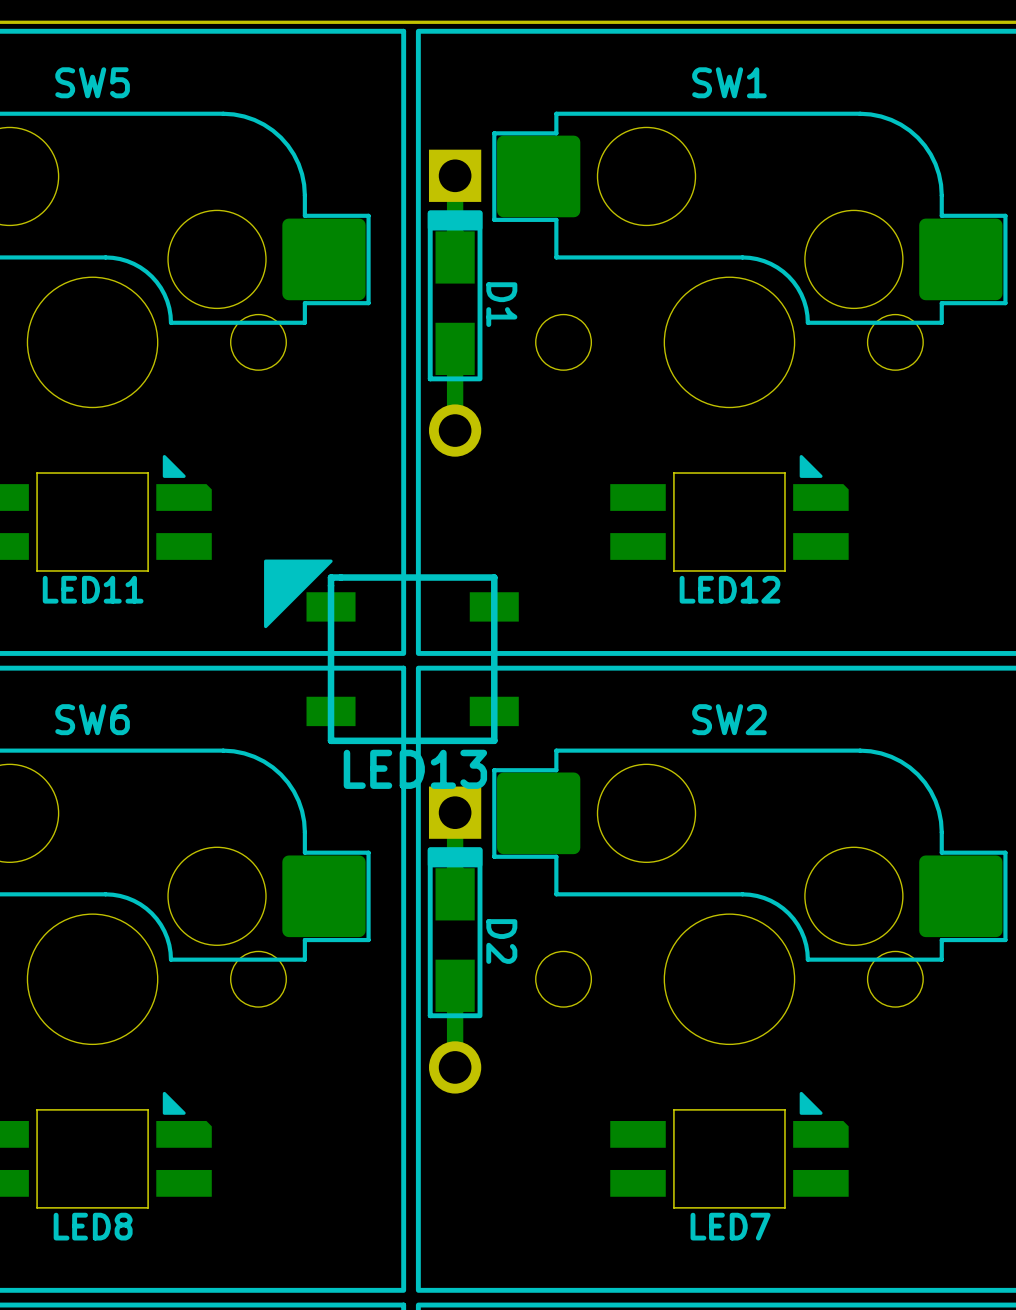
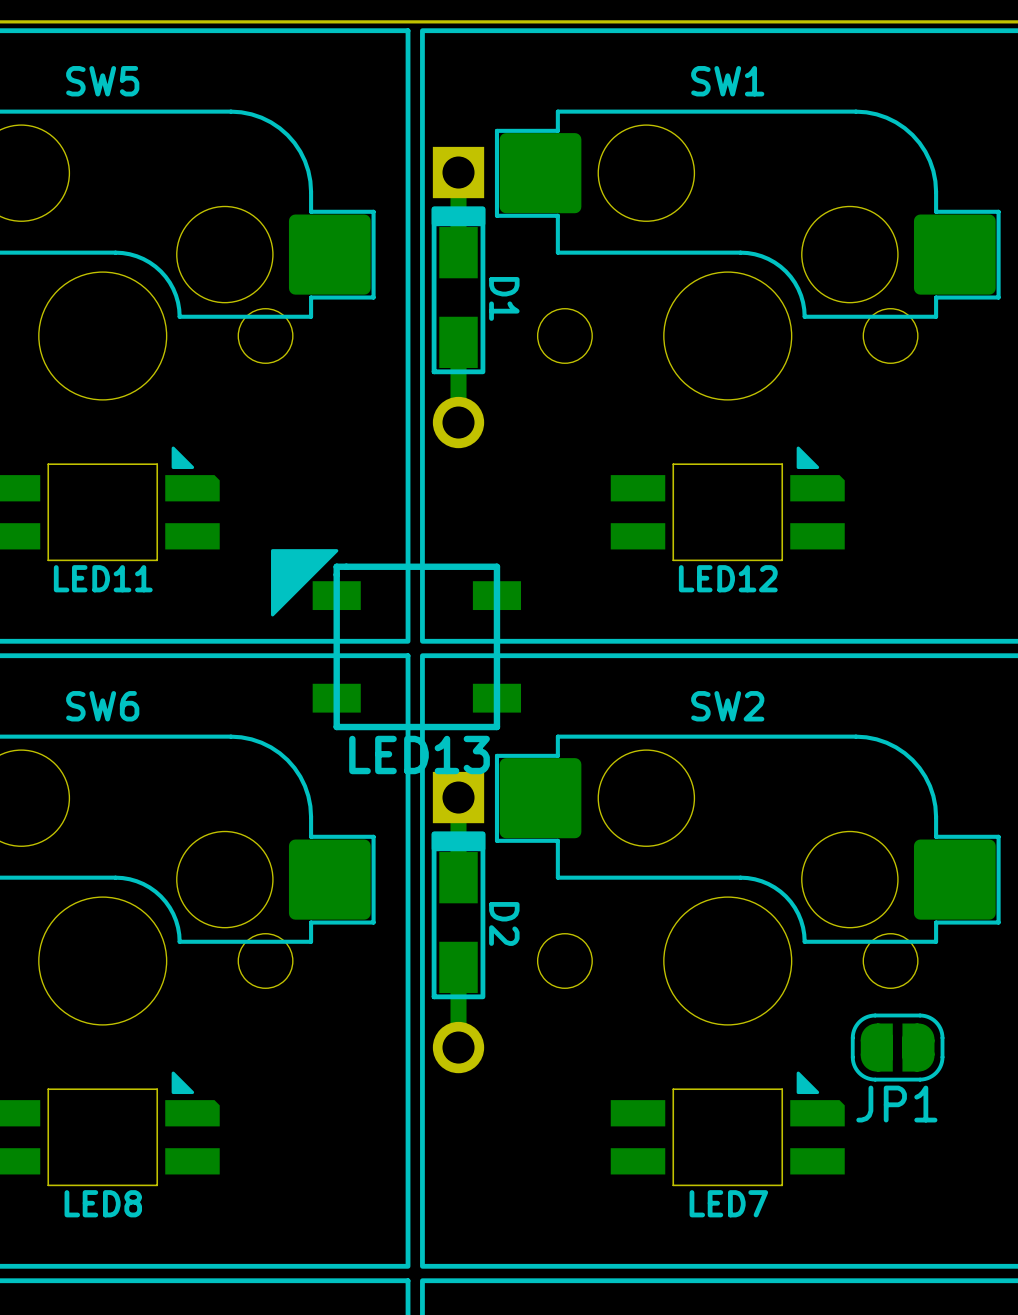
JP1: none -> (897, 1047)

